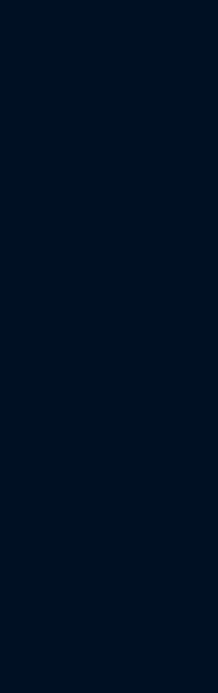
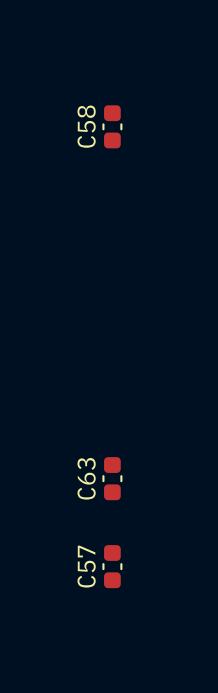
C58: none -> (112, 126)
C63: none -> (112, 478)
C57: none -> (112, 566)

